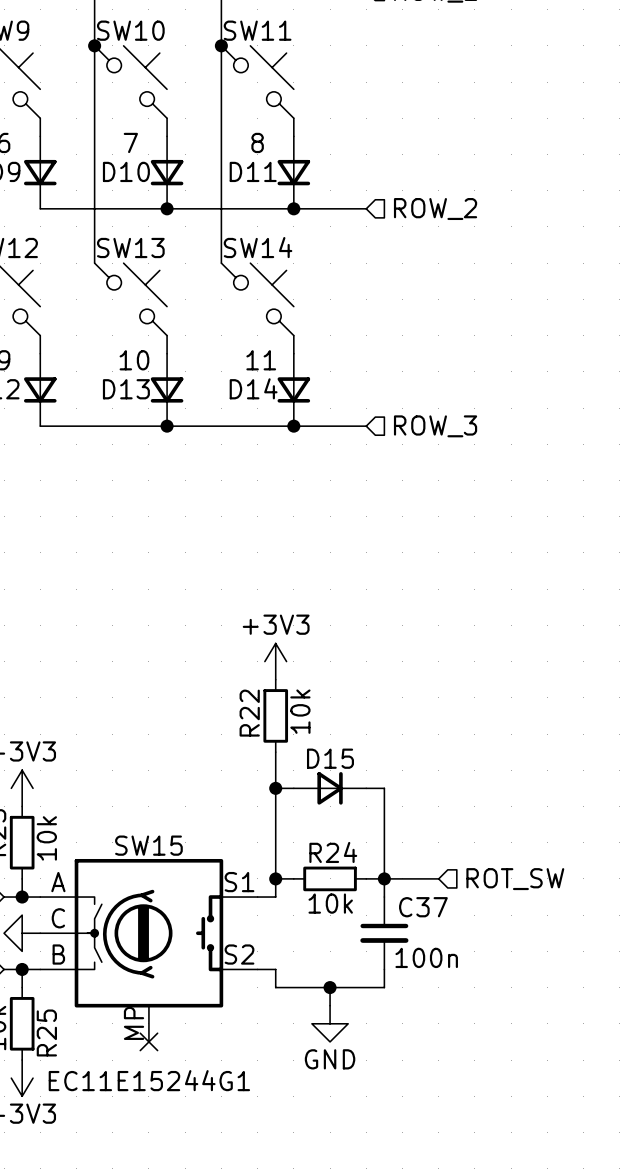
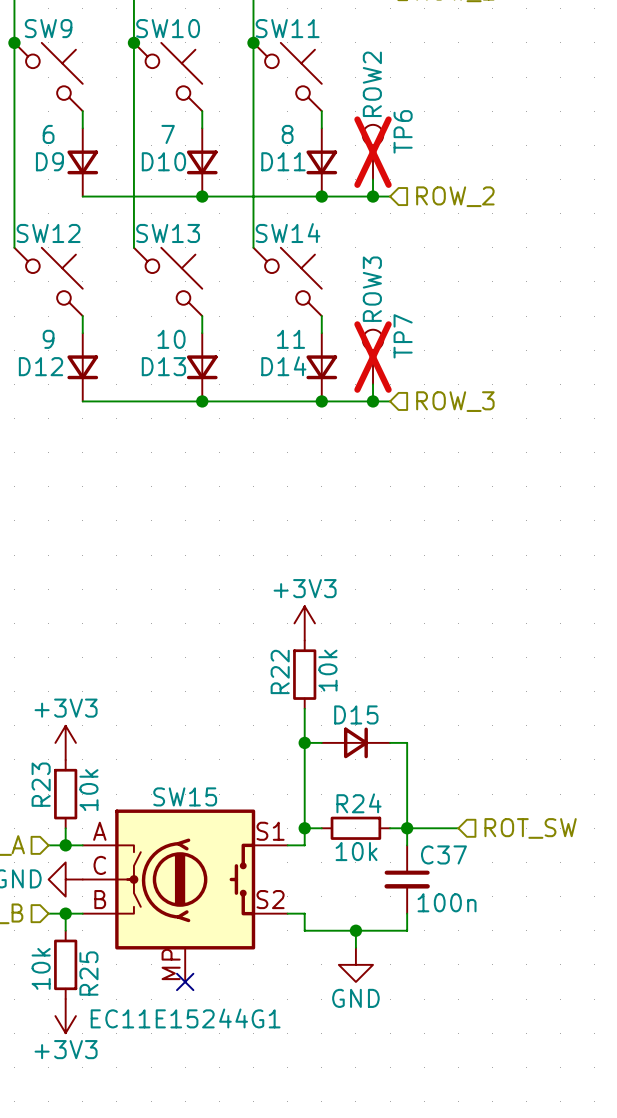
TP6: none -> ROW2 (373, 152)
wire: none -> (373, 179) (373, 196)
junction: none -> (373, 196)
TP7: none -> ROW3 (373, 357)
wire: none -> (373, 384) (373, 401)
junction: none -> (373, 401)

